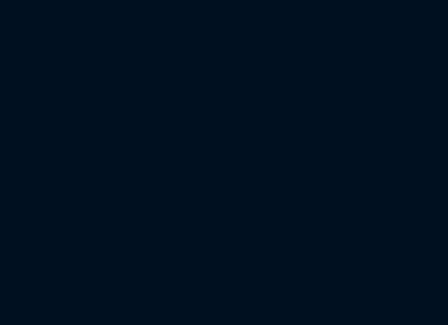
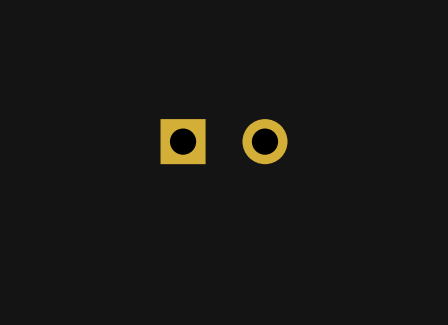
part: none -> (224, 141)

